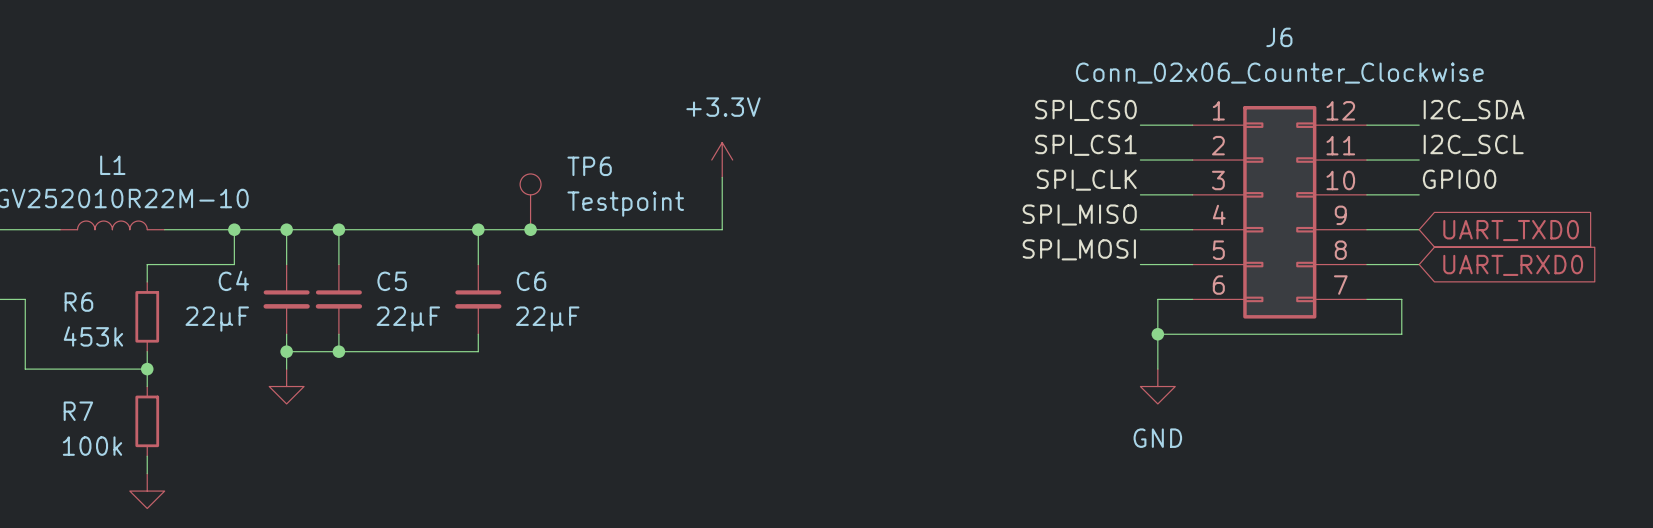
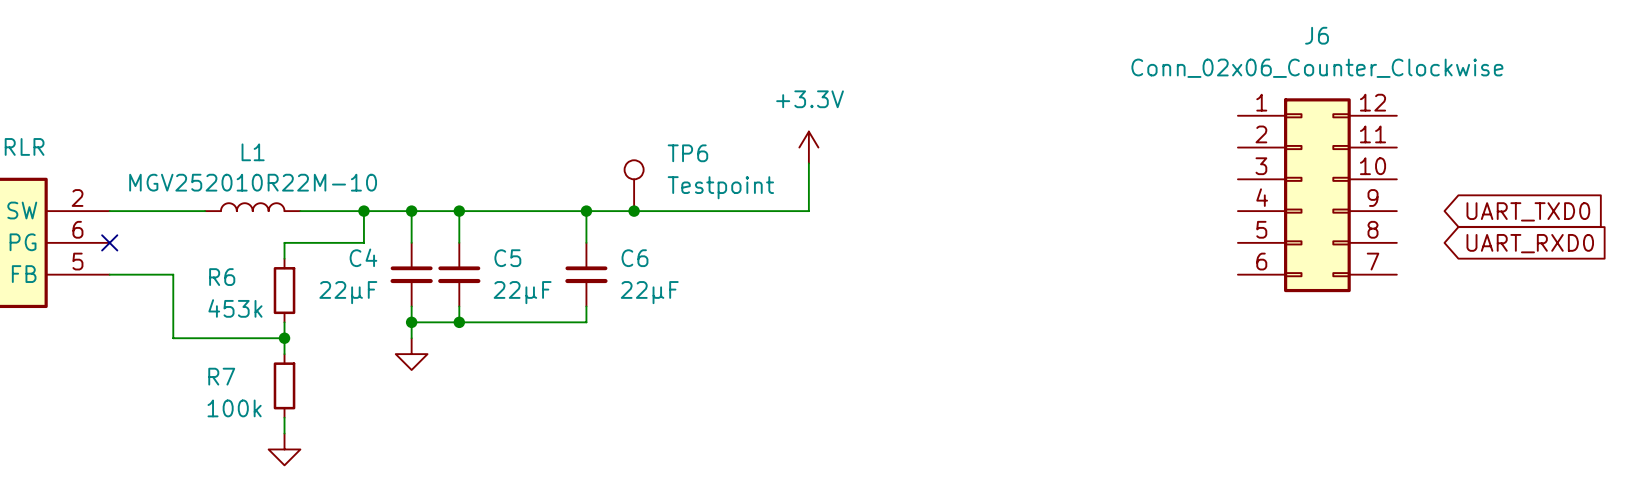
label: SPI_CS0 (1085, 110) -> none
label: I2C_SDA (1474, 110) -> none
wire: (1140, 125) (1192, 125) -> none
wire: (1366, 125) (1419, 125) -> none
label: SPI_CS1 (1085, 145) -> none
label: I2C_SCL (1473, 145) -> none
wire: (1140, 160) (1192, 160) -> none
wire: (1366, 160) (1419, 160) -> none
label: GPIO0 (1459, 179) -> none
label: SPI_CLK (1086, 180) -> none
wire: (1140, 194) (1192, 194) -> none
wire: (1366, 194) (1419, 194) -> none
label: SPI_MISO (1079, 214) -> none
wire: (1140, 229) (1192, 229) -> none
wire: (1366, 229) (1419, 229) -> none
label: SPI_MOSI (1079, 249) -> none
wire: (1140, 264) (1192, 264) -> none
wire: (1366, 264) (1419, 264) -> none
wire: (1192, 299) (1157, 299) (1157, 369) -> none
wire: (1366, 299) (1401, 299) (1401, 334) (1157, 334) -> none
junction: (1157, 334) -> none
power symbol: GND (1157, 386) -> none

